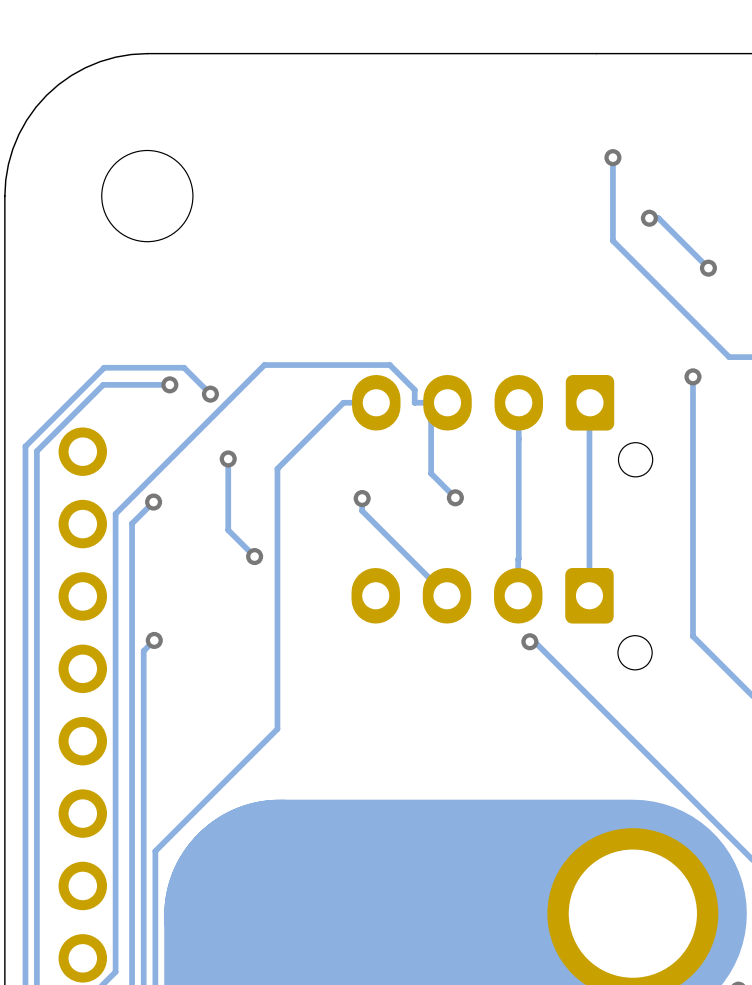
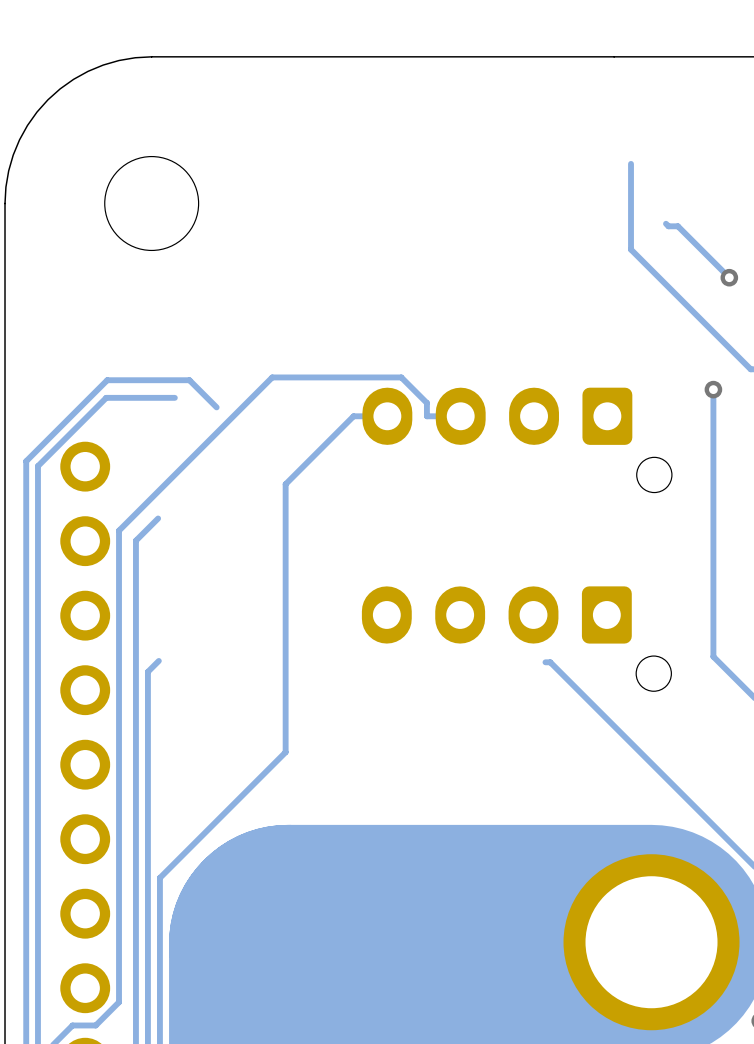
via: (612, 157) -> none
via: (649, 218) -> none
via: (169, 384) -> none
via: (210, 394) -> none
track: (431, 402) (431, 473) (455, 497) -> none
track: (518, 402) (518, 595) -> none
track: (590, 402) (589, 595) -> none
track: (228, 458) (228, 530) (254, 556) -> none
via: (228, 458) -> none
via: (455, 497) -> none
track: (362, 498) (362, 510) (446, 595) -> none
via: (362, 498) -> none
via: (153, 502) -> none
via: (254, 556) -> none
via: (154, 640) -> none
via: (529, 641) -> none

